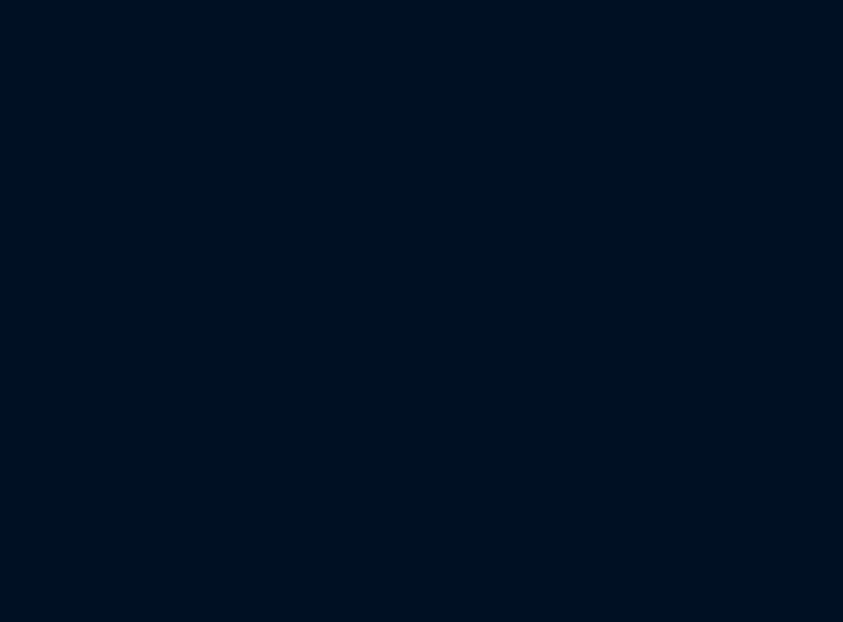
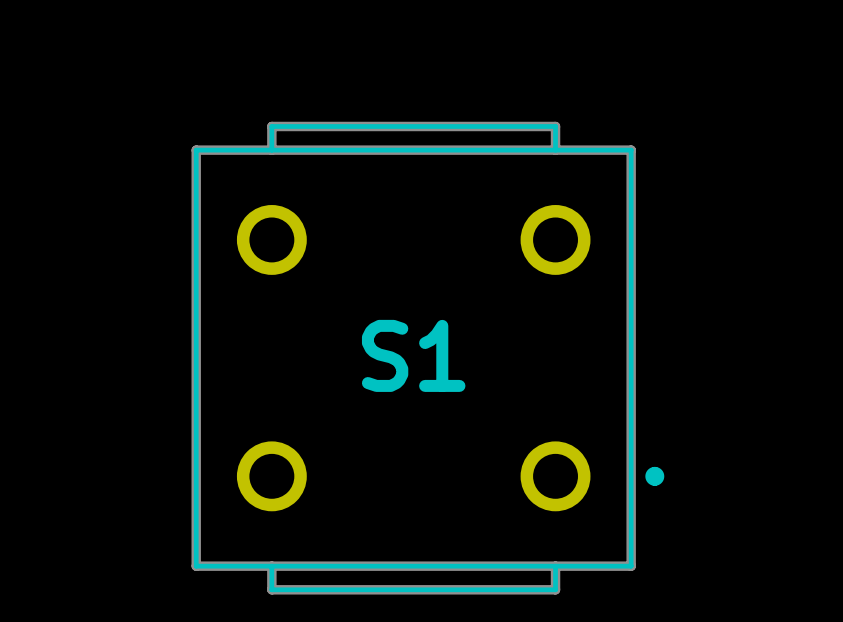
S1: none -> (427, 358)

